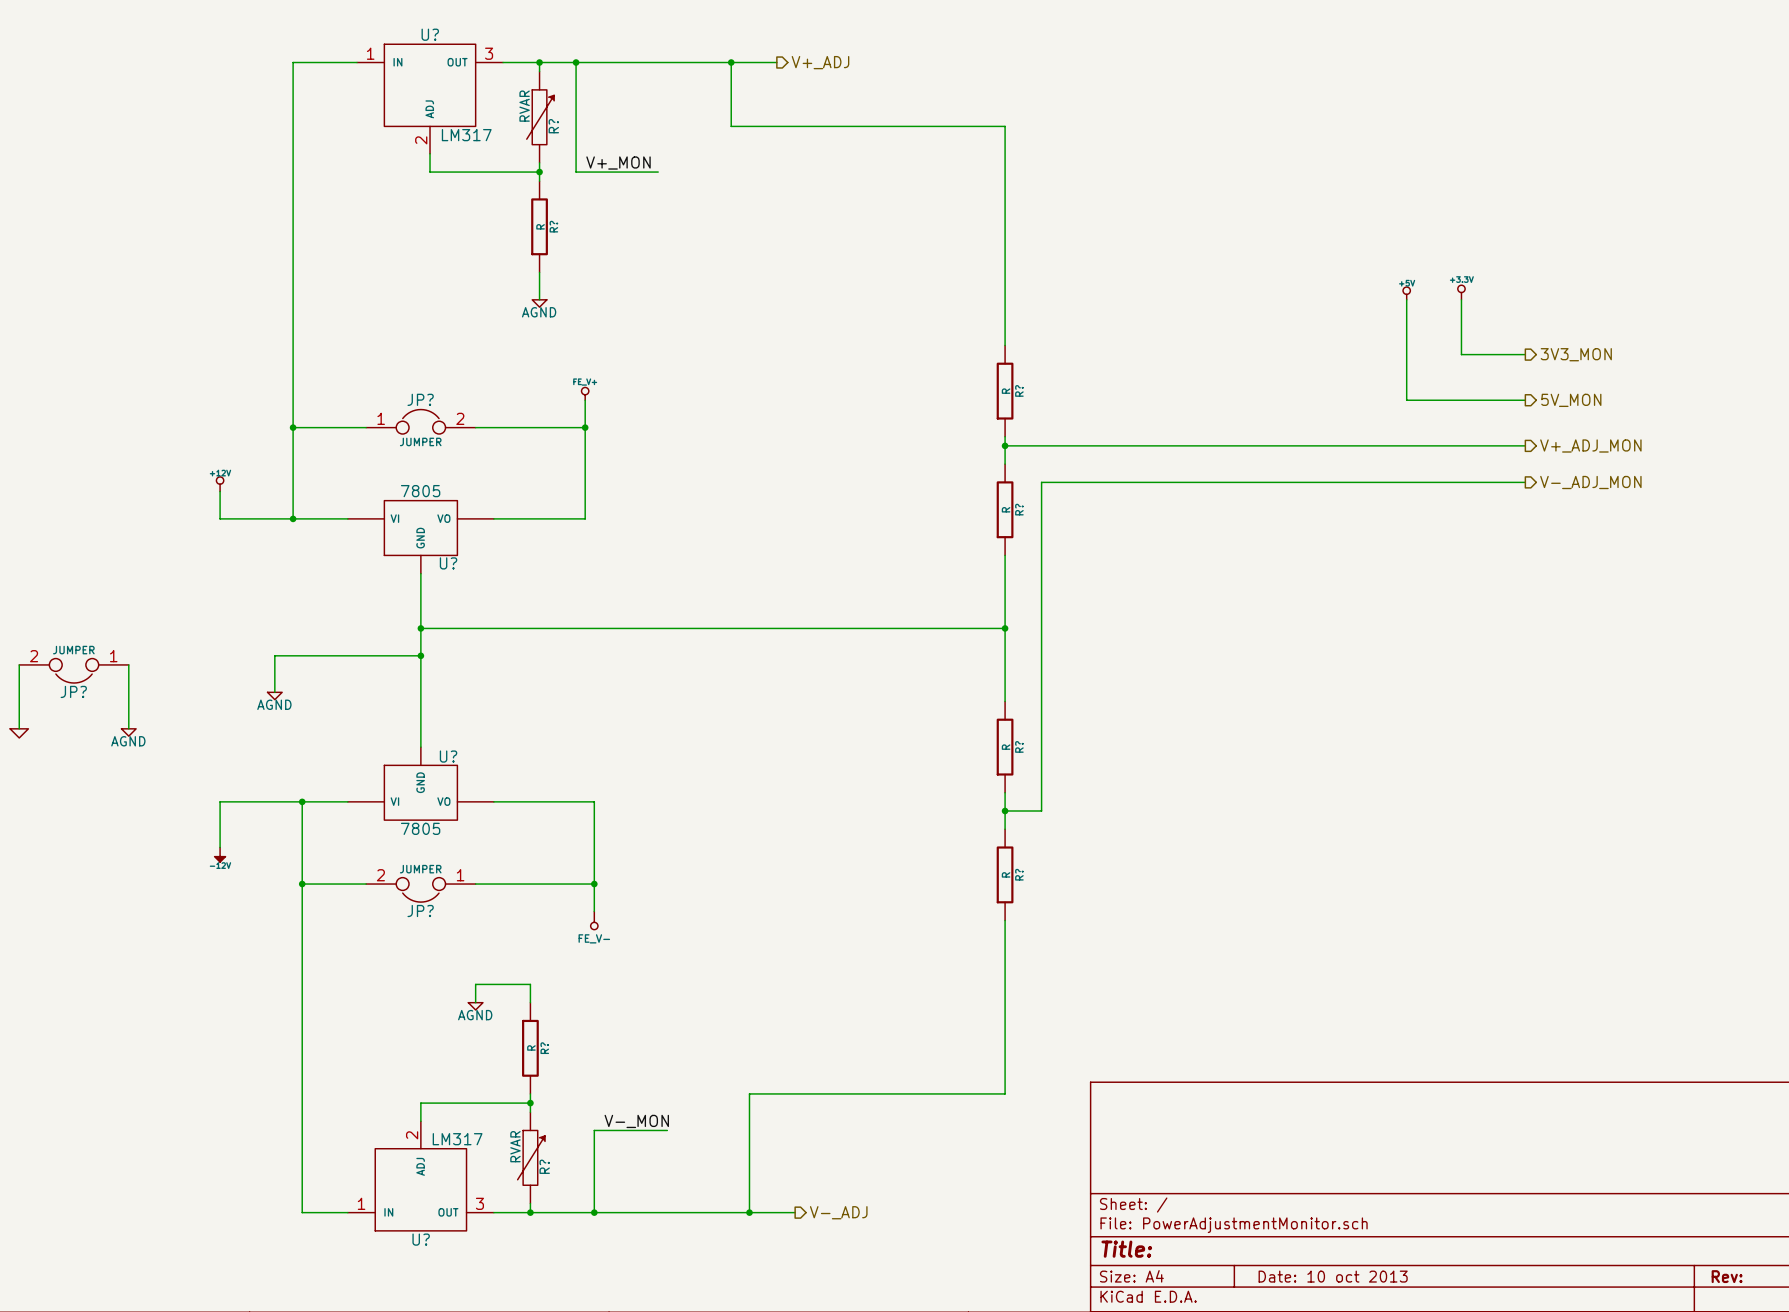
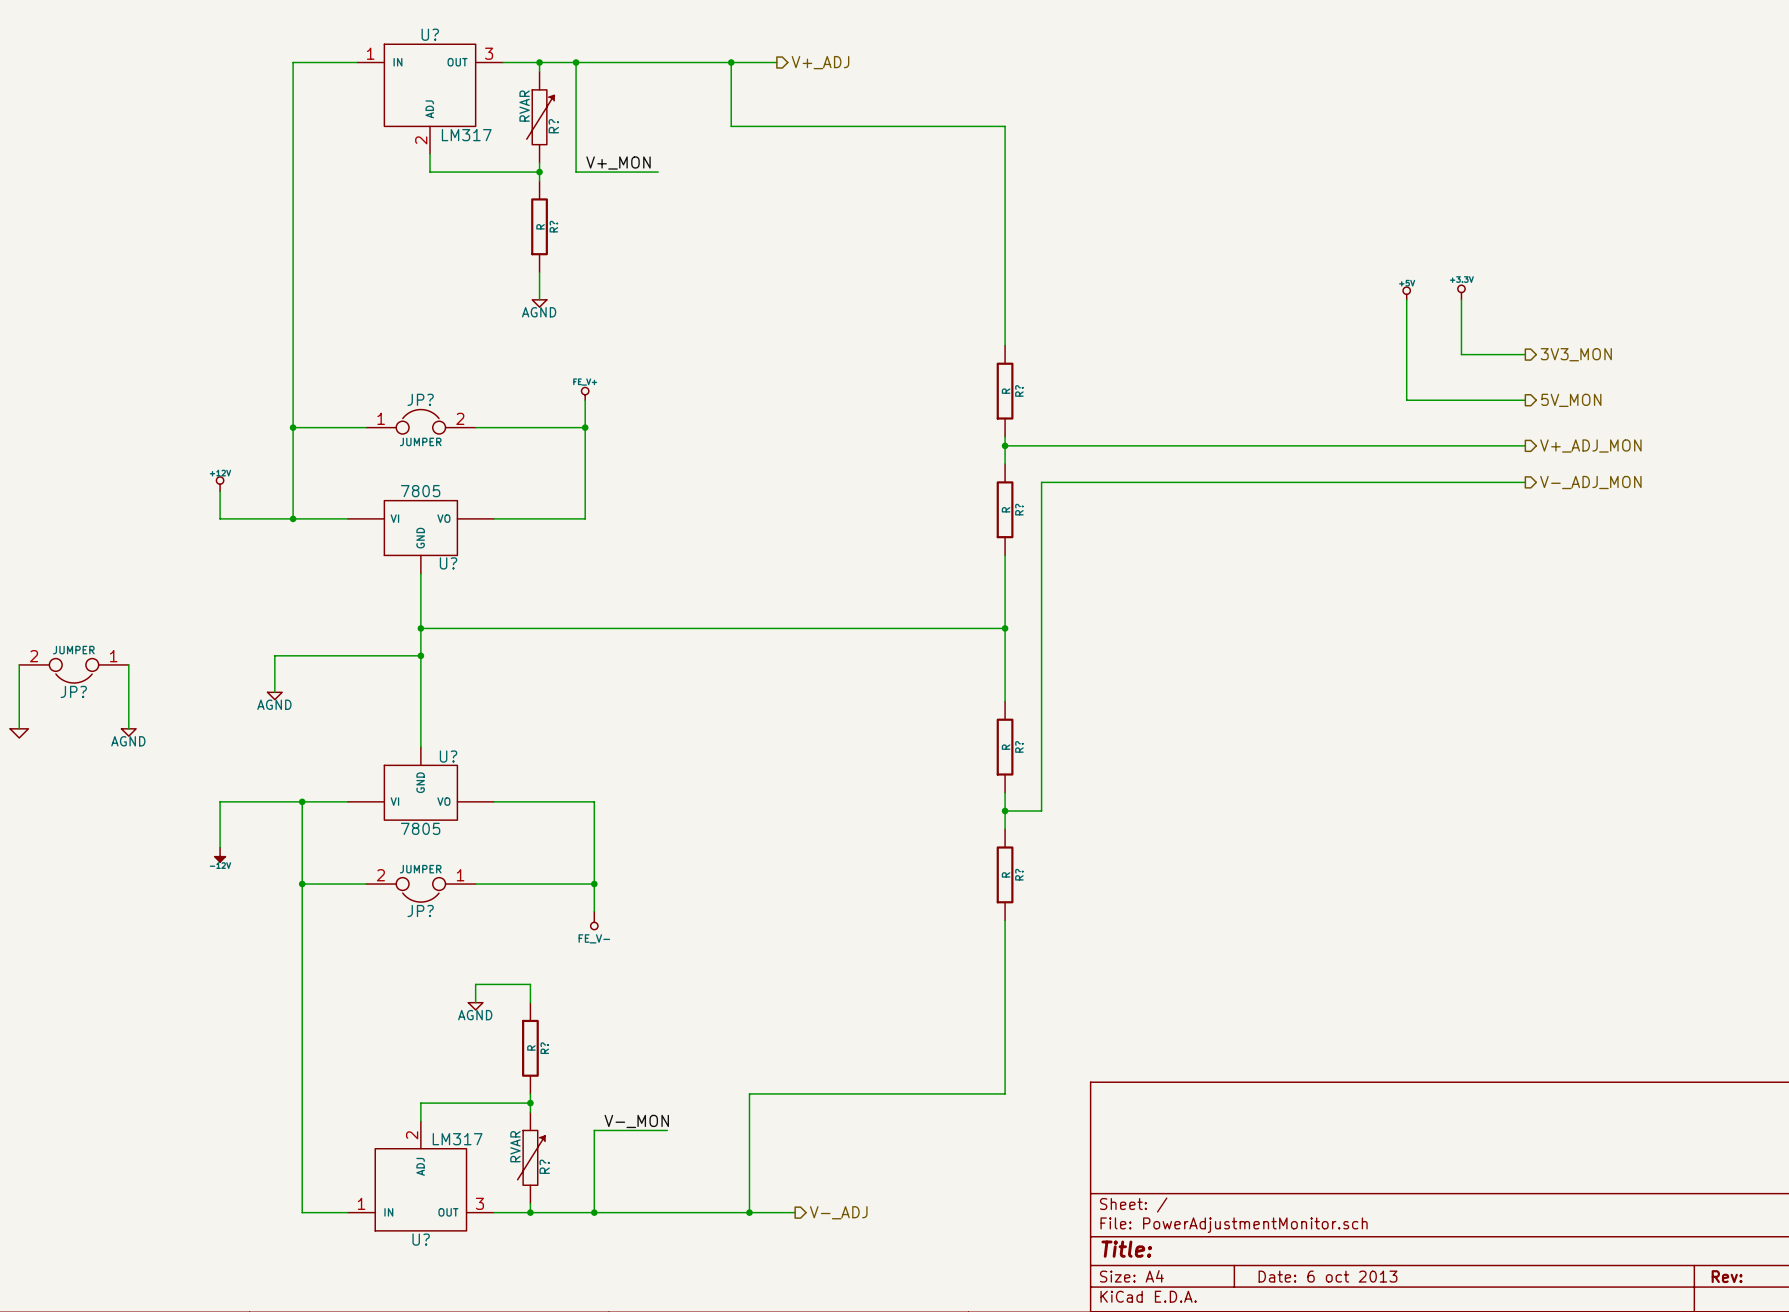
title block: Date: 10 oct 2013 (1333, 1276) -> Date: 6 oct 2013 (1328, 1276)

